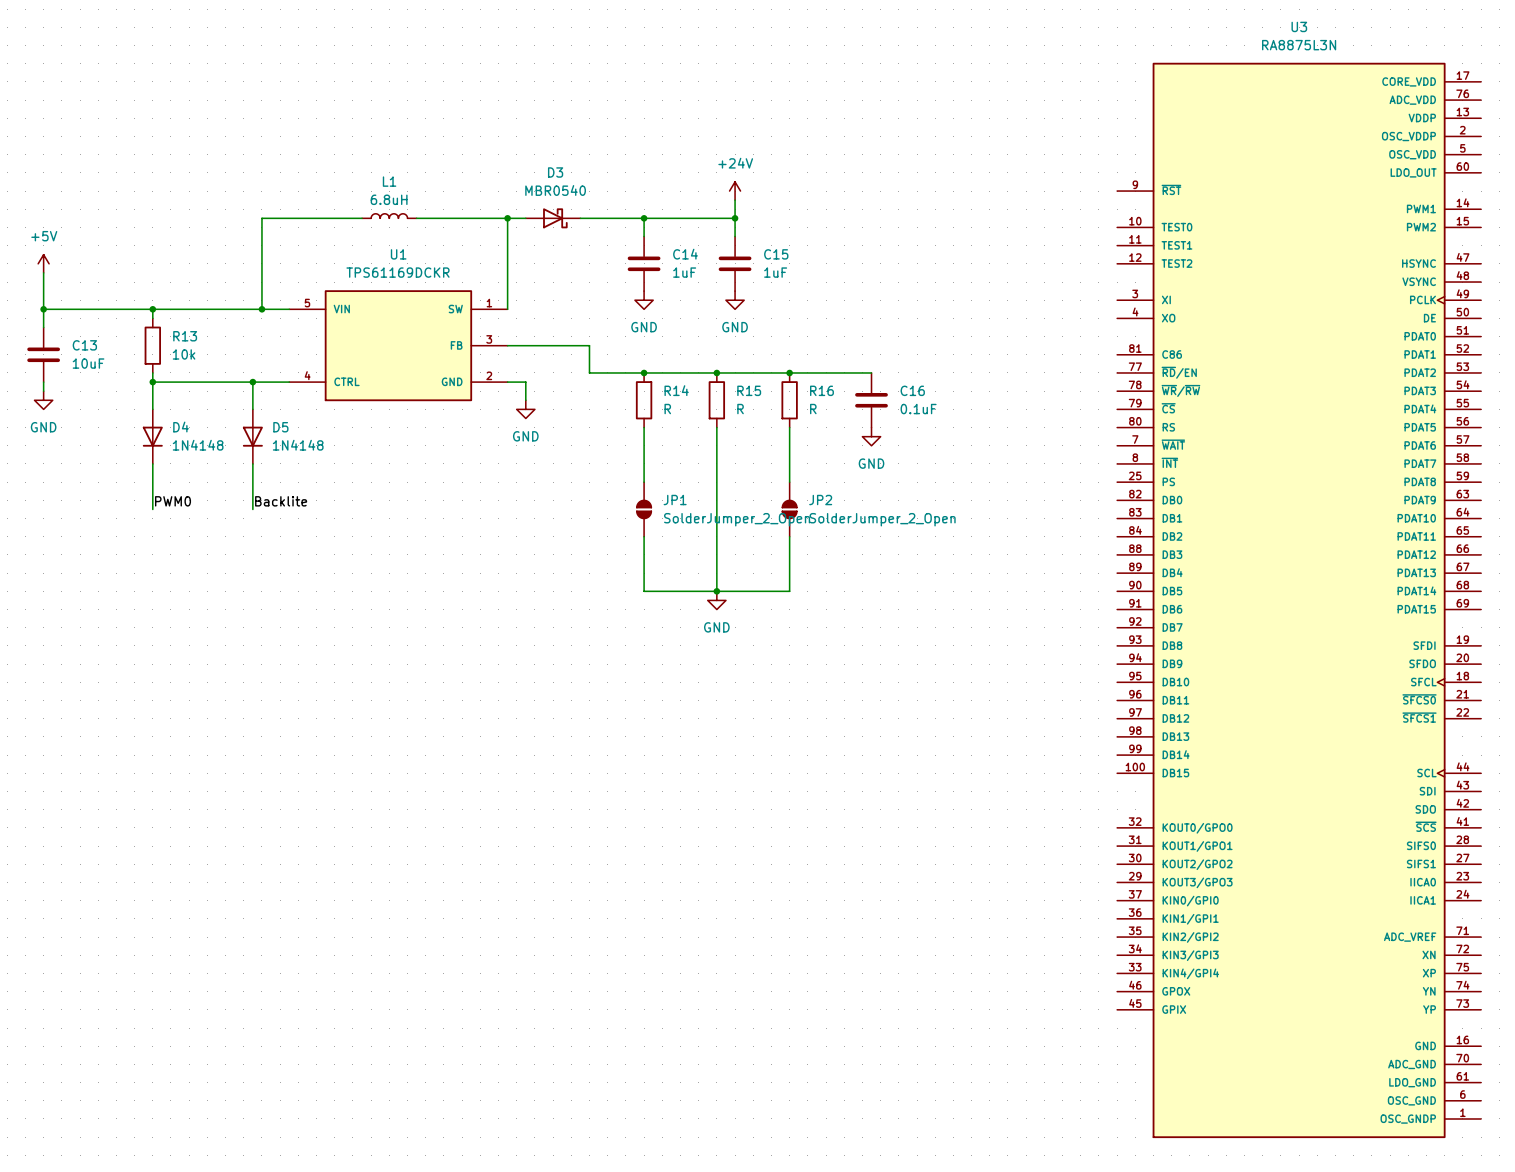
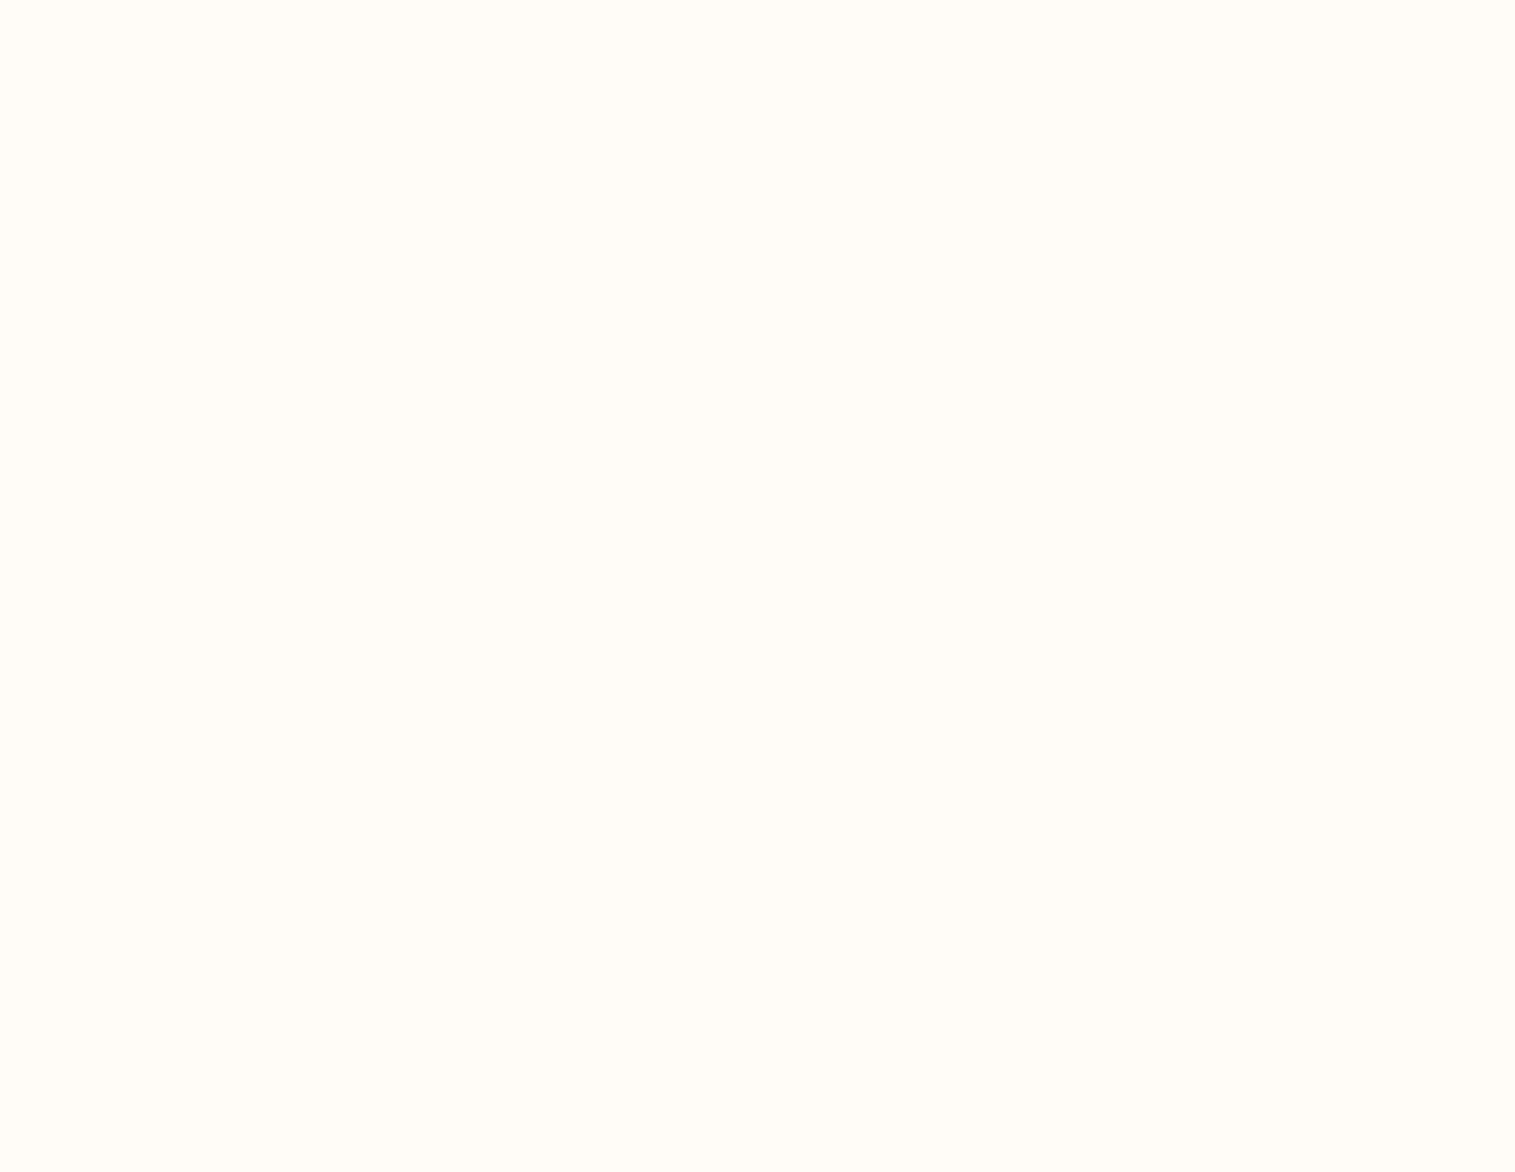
power symbol: +24V (735, 191) -> none
wire: (735, 200) (735, 236) -> none
L1: 6.8uH (389, 216) -> none
wire: (362, 218) (261, 218) (261, 309) -> none
wire: (416, 218) (525, 218) -> none
wire: (507, 218) (507, 309) -> none
junction: (507, 218) -> none
D3: MBR0540 (553, 218) -> none
wire: (580, 218) (735, 218) -> none
wire: (644, 218) (644, 236) -> none
junction: (644, 218) -> none
junction: (735, 218) -> none
power symbol: +5V (43, 263) -> none
C14: 1uF (644, 263) -> none
C15: 1uF (735, 263) -> none
wire: (43, 272) (43, 327) -> none
power symbol: GND (644, 300) -> none
power symbol: GND (735, 300) -> none
wire: (43, 309) (289, 309) -> none
junction: (43, 309) -> none
wire: (152, 309) (152, 318) -> none
junction: (152, 309) -> none
junction: (261, 309) -> none
R13: 10k (152, 345) -> none
U1: TPS61169DCKR (398, 345) -> none
wire: (507, 345) (589, 345) (589, 372) (871, 372) -> none
C13: 10uF (43, 354) -> none
wire: (152, 372) (152, 409) -> none
junction: (644, 372) -> none
junction: (716, 372) -> none
junction: (789, 372) -> none
wire: (43, 382) (43, 391) -> none
wire: (152, 382) (289, 382) -> none
junction: (152, 382) -> none
wire: (252, 382) (252, 409) -> none
junction: (252, 382) -> none
wire: (507, 382) (525, 382) (525, 400) -> none
power symbol: GND (43, 400) -> none
R14: R (644, 400) -> none
R15: R (716, 400) -> none
R16: R (789, 400) -> none
C16: 0.1uF (871, 400) -> none
power symbol: GND (525, 409) -> none
wire: (644, 427) (644, 482) -> none
wire: (716, 427) (716, 591) -> none
wire: (789, 427) (789, 482) -> none
D4: 1N4148 (152, 436) -> none
D5: 1N4148 (252, 436) -> none
power symbol: GND (871, 436) -> none
wire: (152, 463) (152, 509) -> none
wire: (252, 463) (252, 509) -> none
label: PWM0 (173, 501) -> none
label: Backlite (281, 501) -> none
JP1: SolderJumper_2_Open (644, 509) -> none
JP2: SolderJumper_2_Open (789, 509) -> none
wire: (644, 536) (644, 591) (789, 591) (789, 536) -> none
junction: (716, 591) -> none
power symbol: GND (716, 600) -> none
U3: RA8875L3N (1299, 600) -> none

